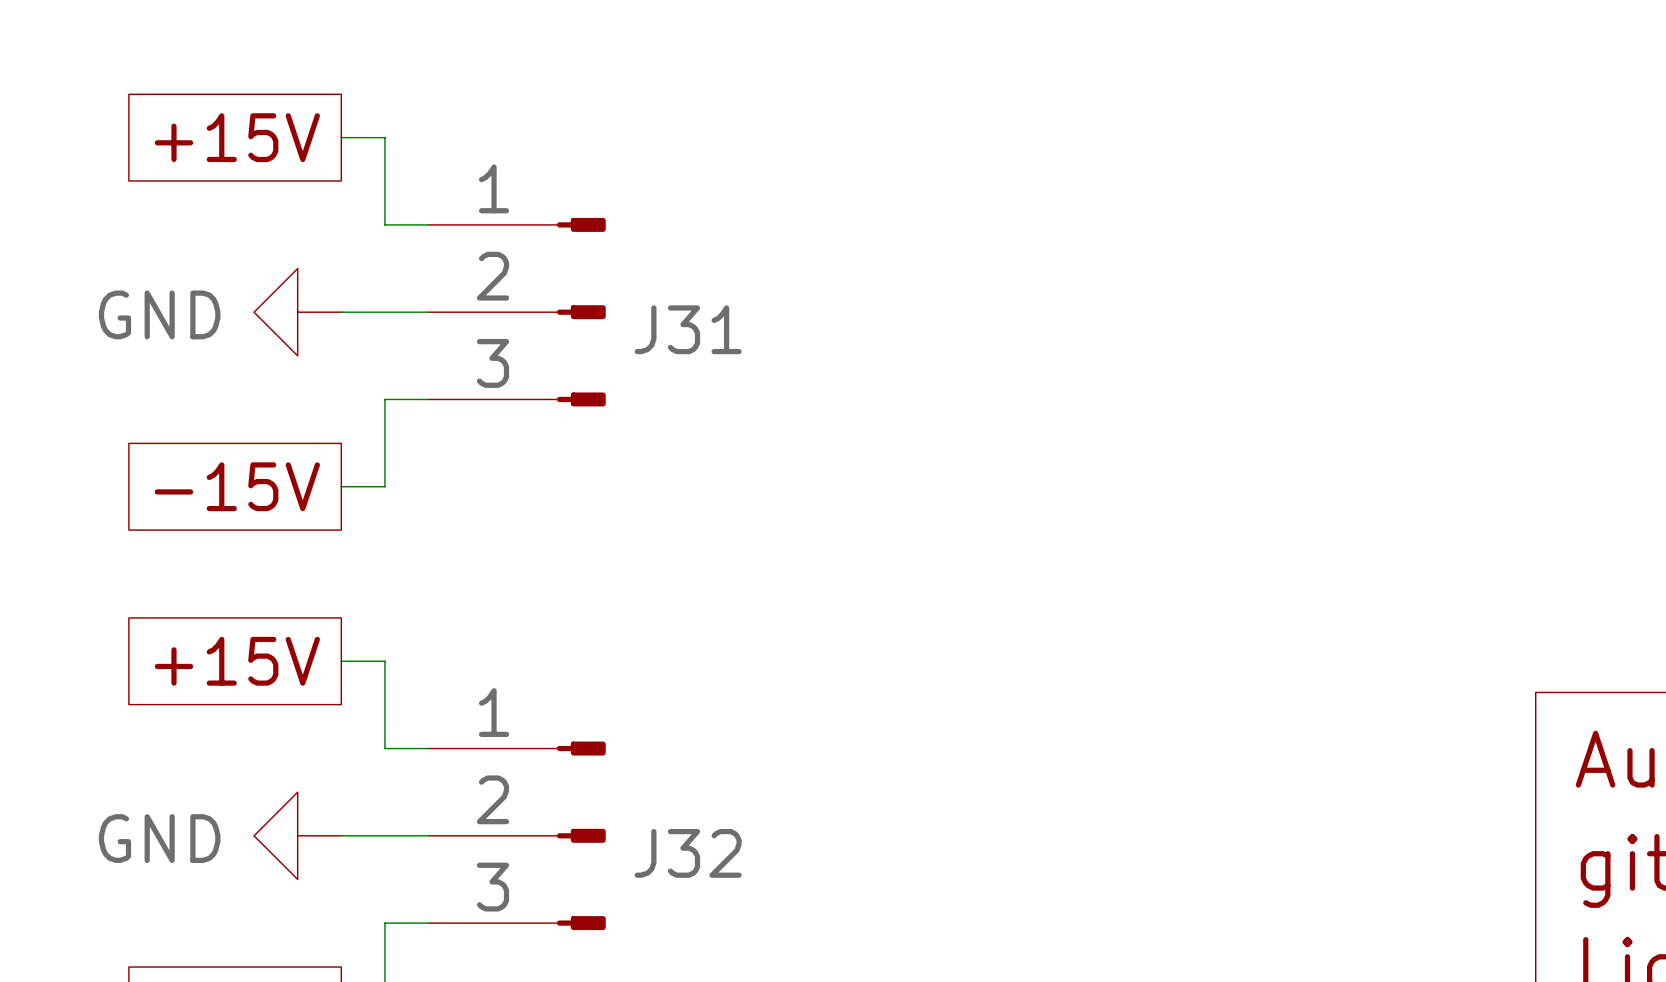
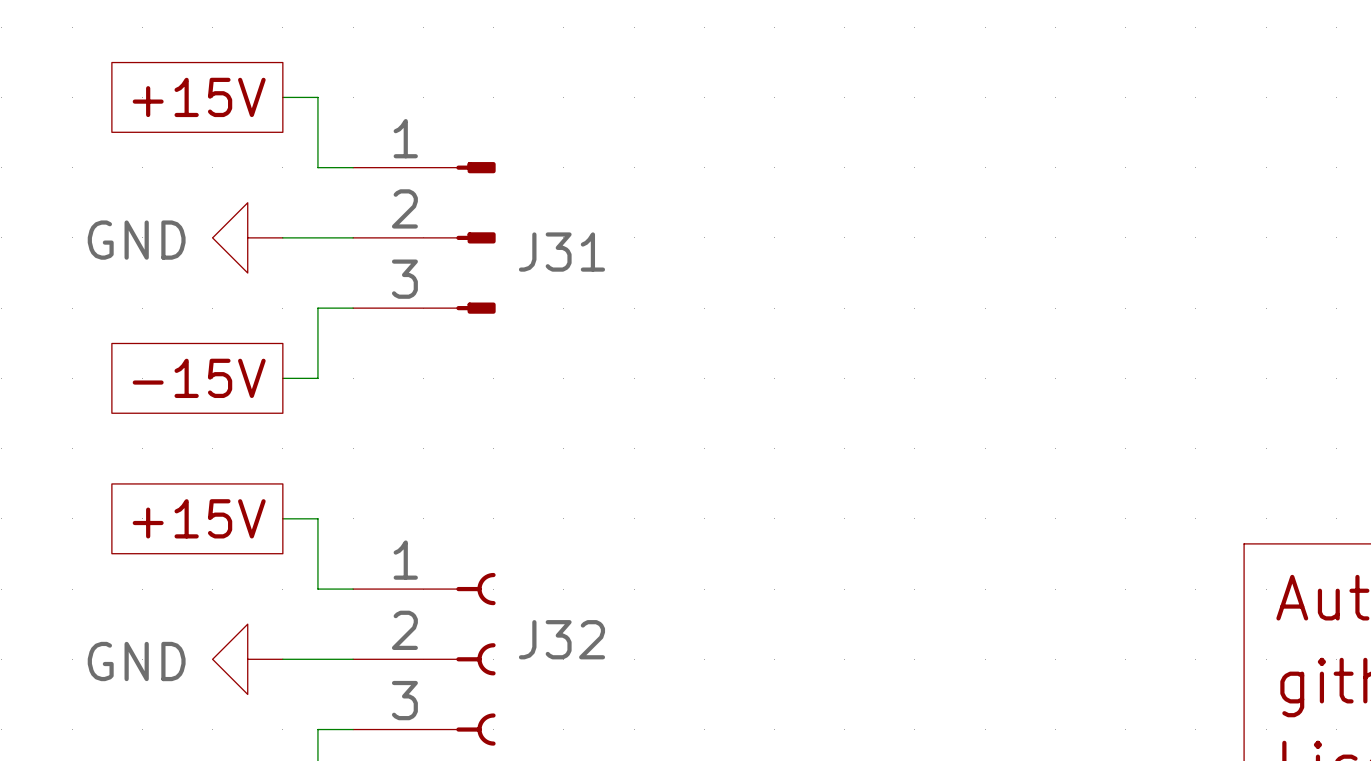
J32 symbol: [428, 741, 606, 931] -> [353, 572, 496, 746]
J32 name position: J32 (688, 853) -> J32 (561, 639)

